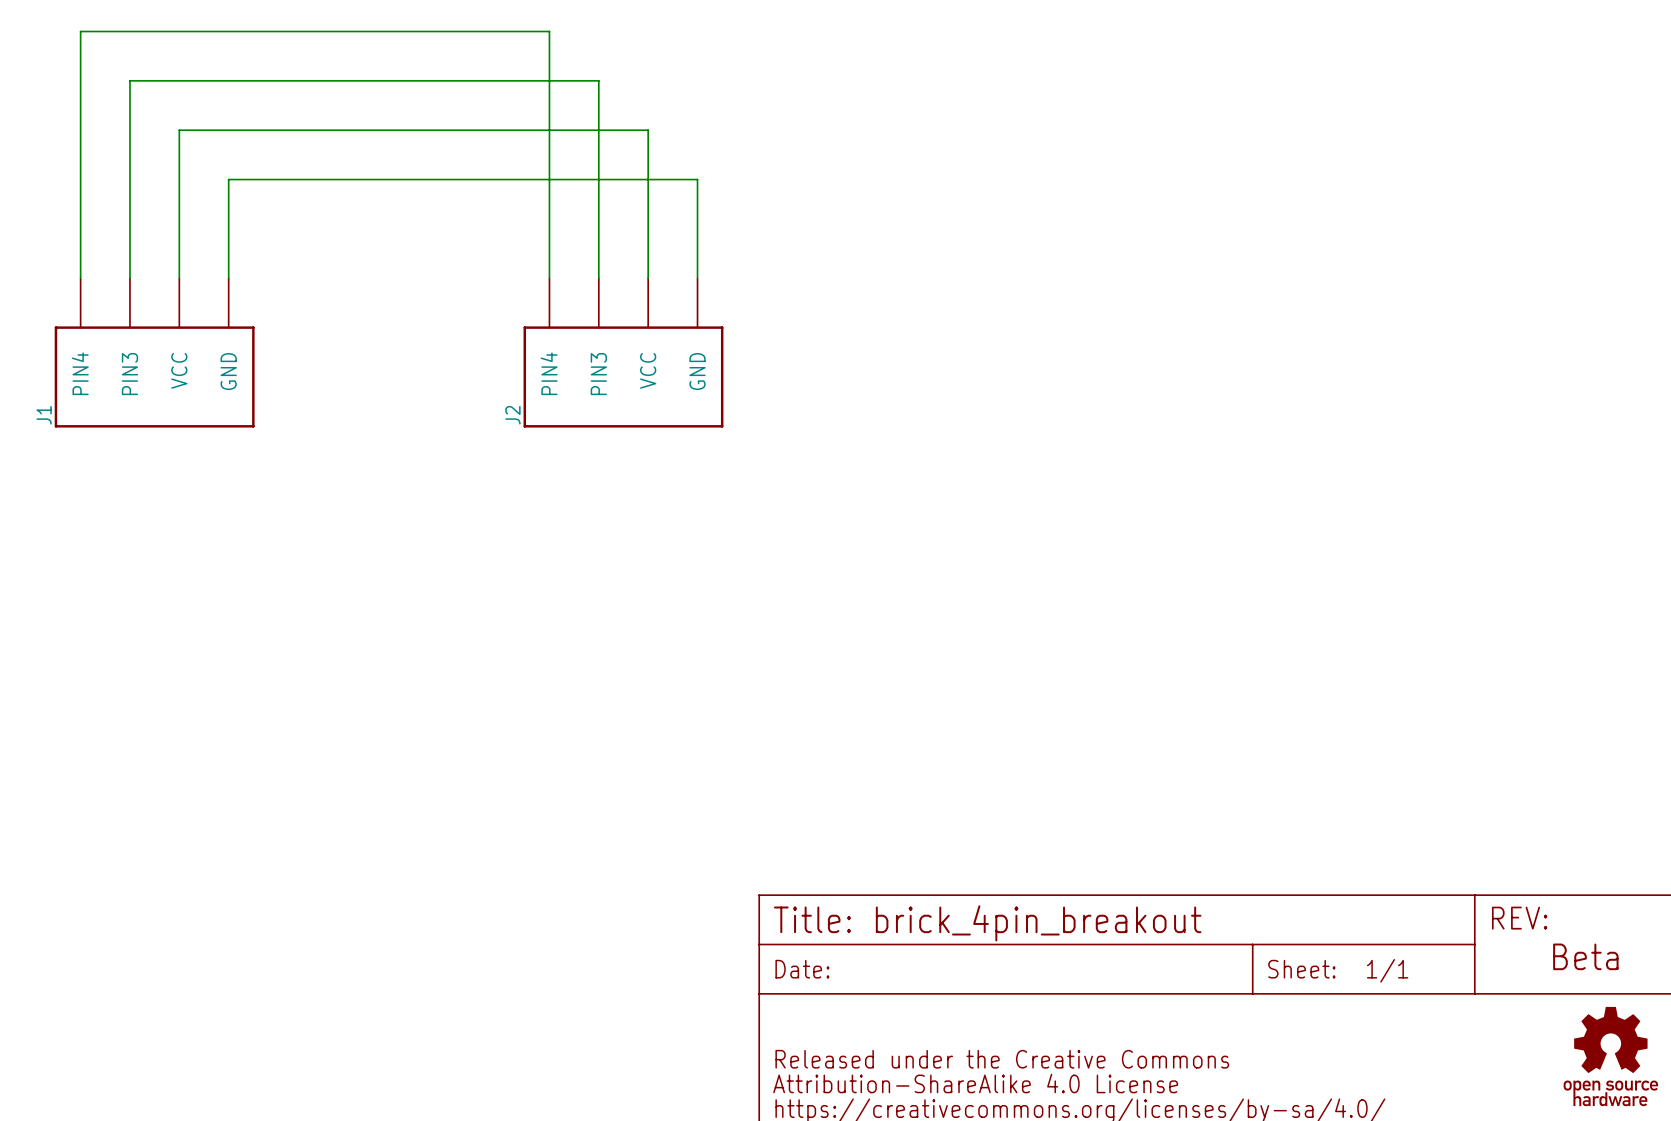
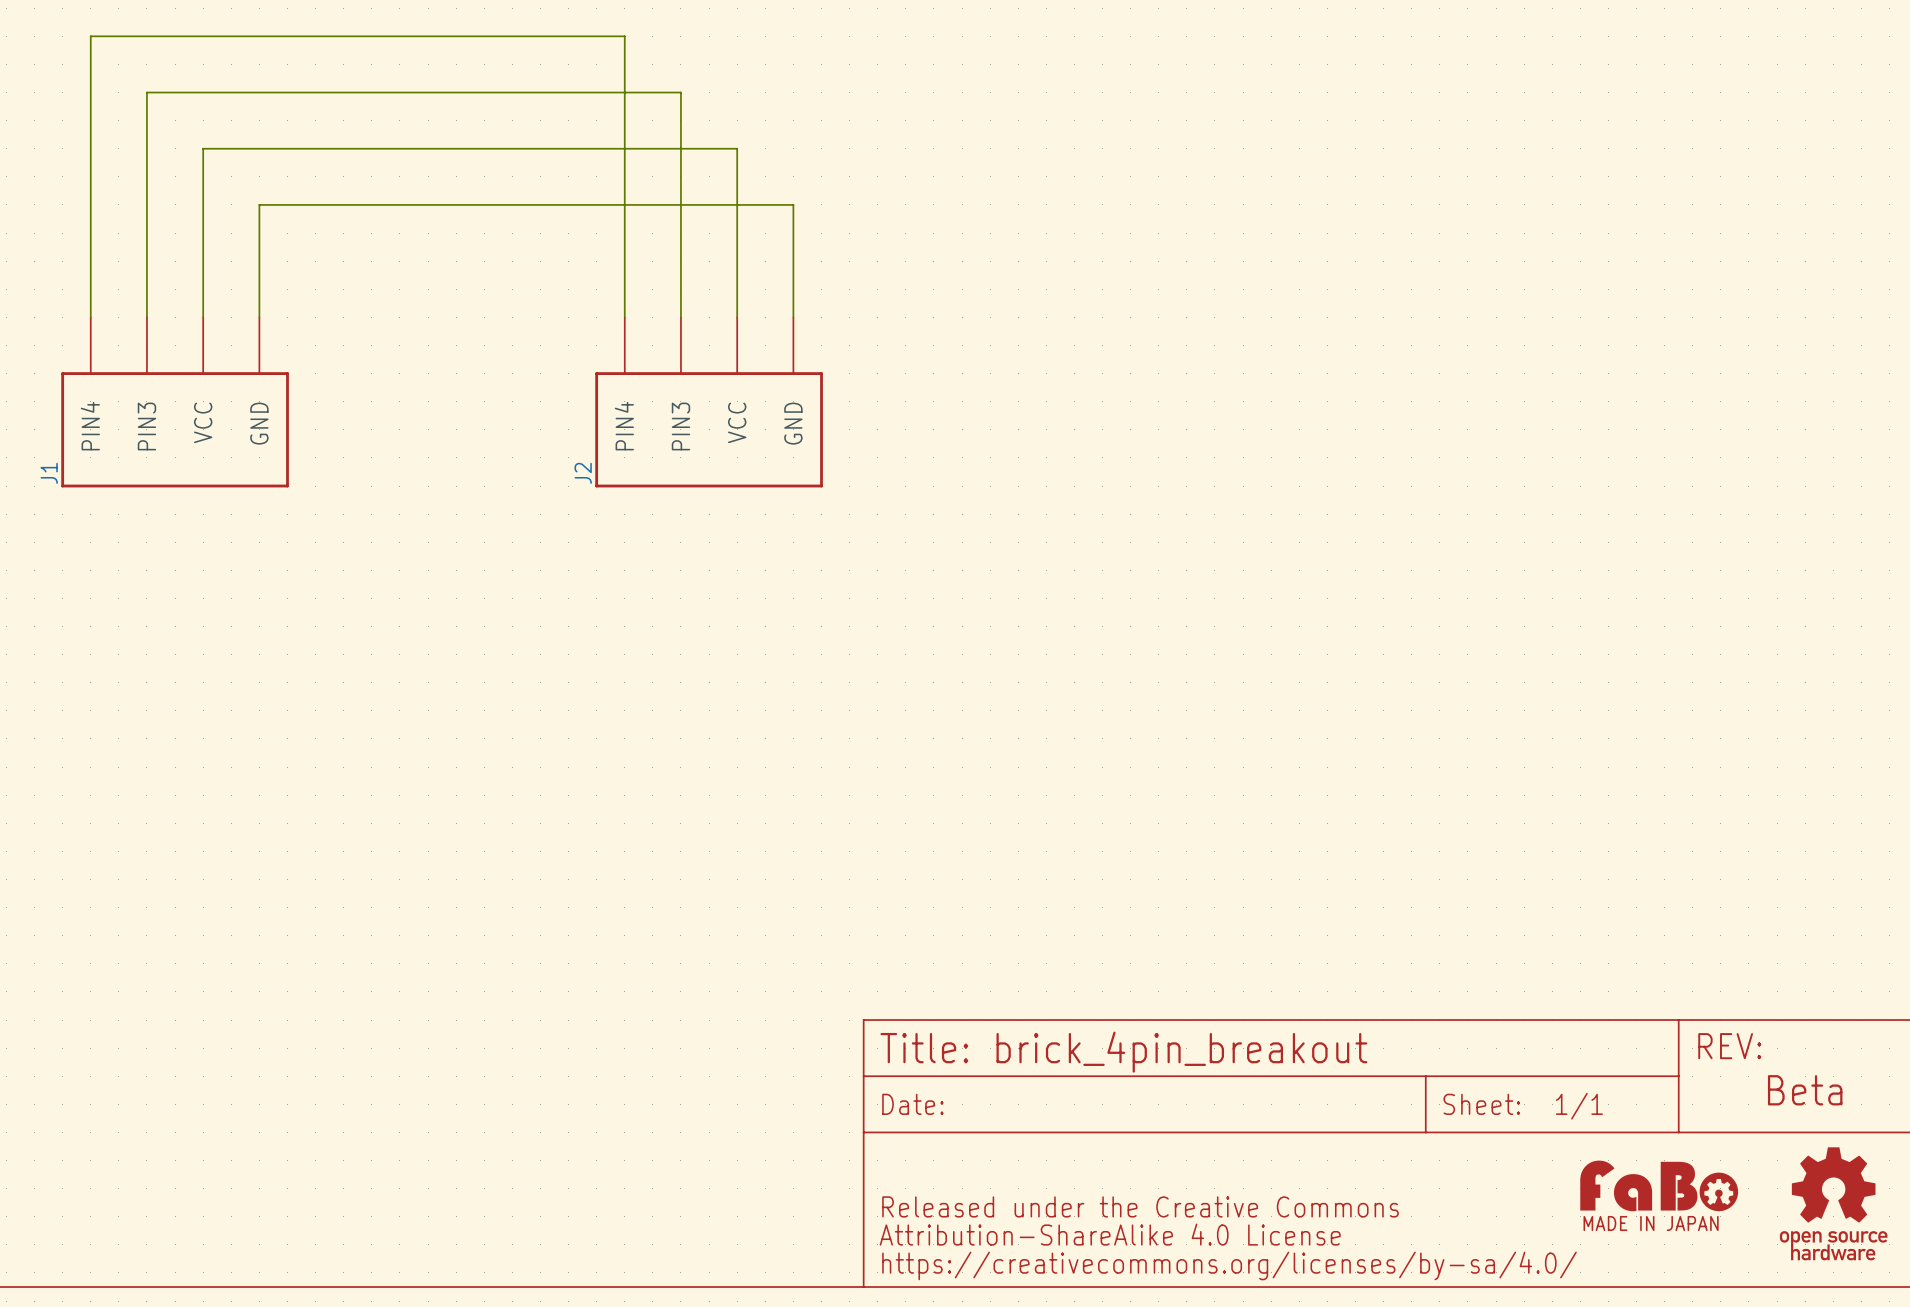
part: none -> (1659, 1185)

